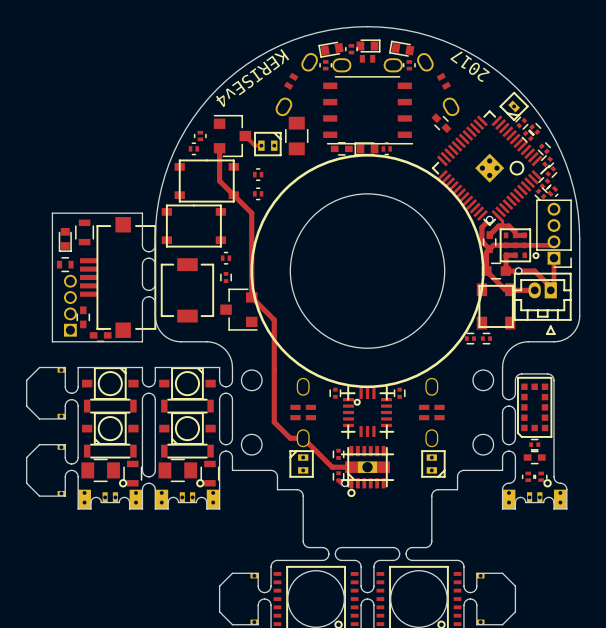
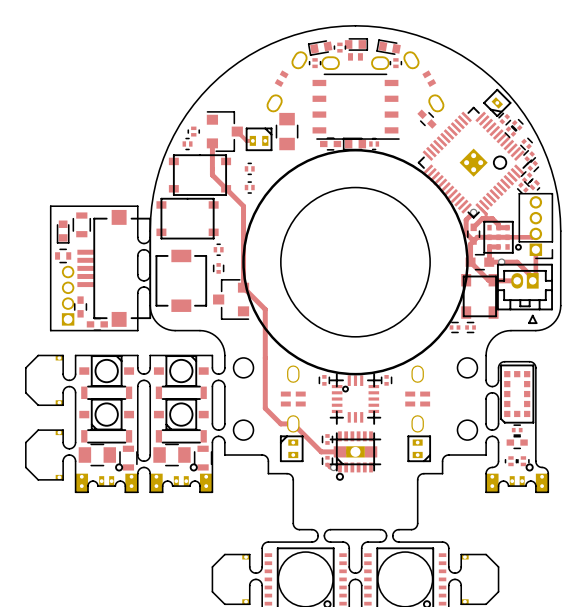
text: 2017 (470, 66) -> none
text: KERISEv4 (252, 78) -> none

